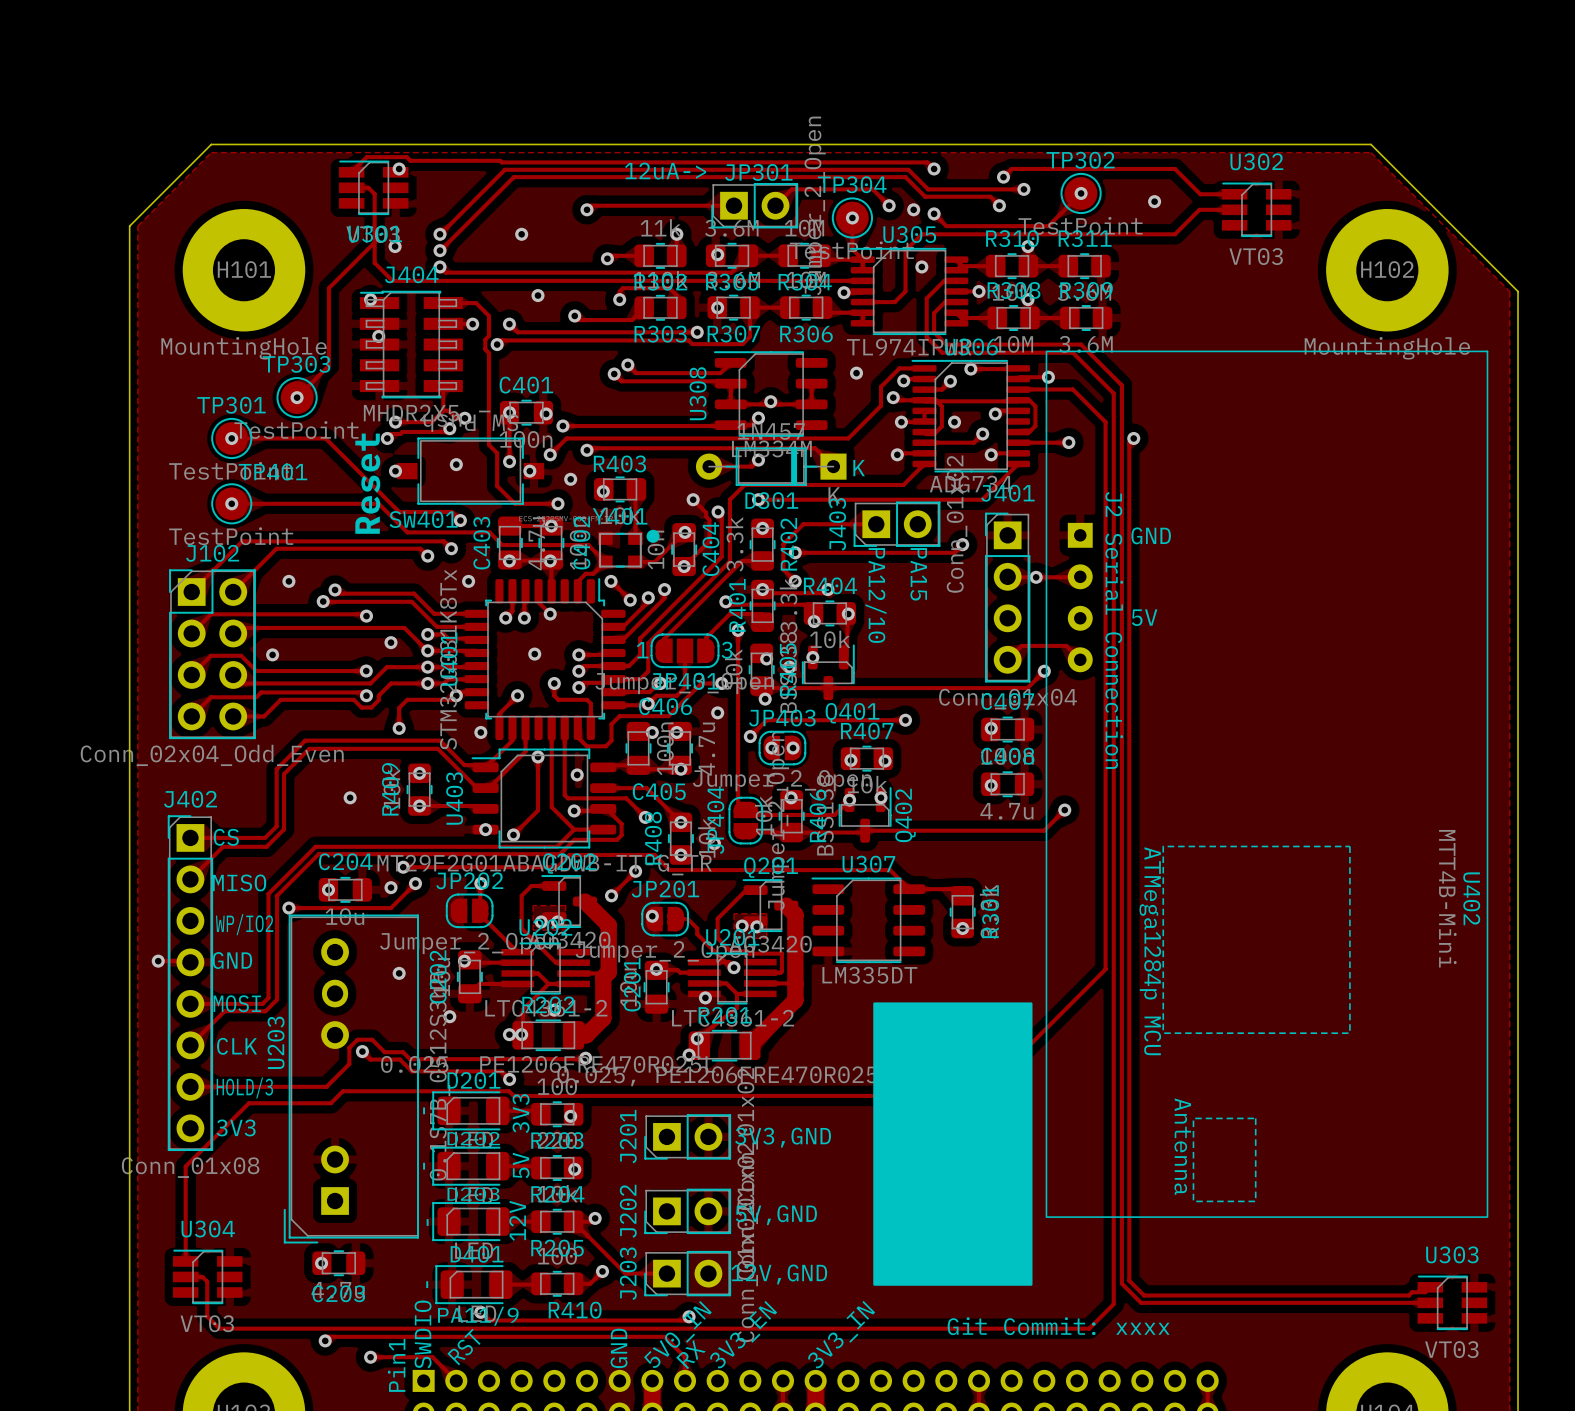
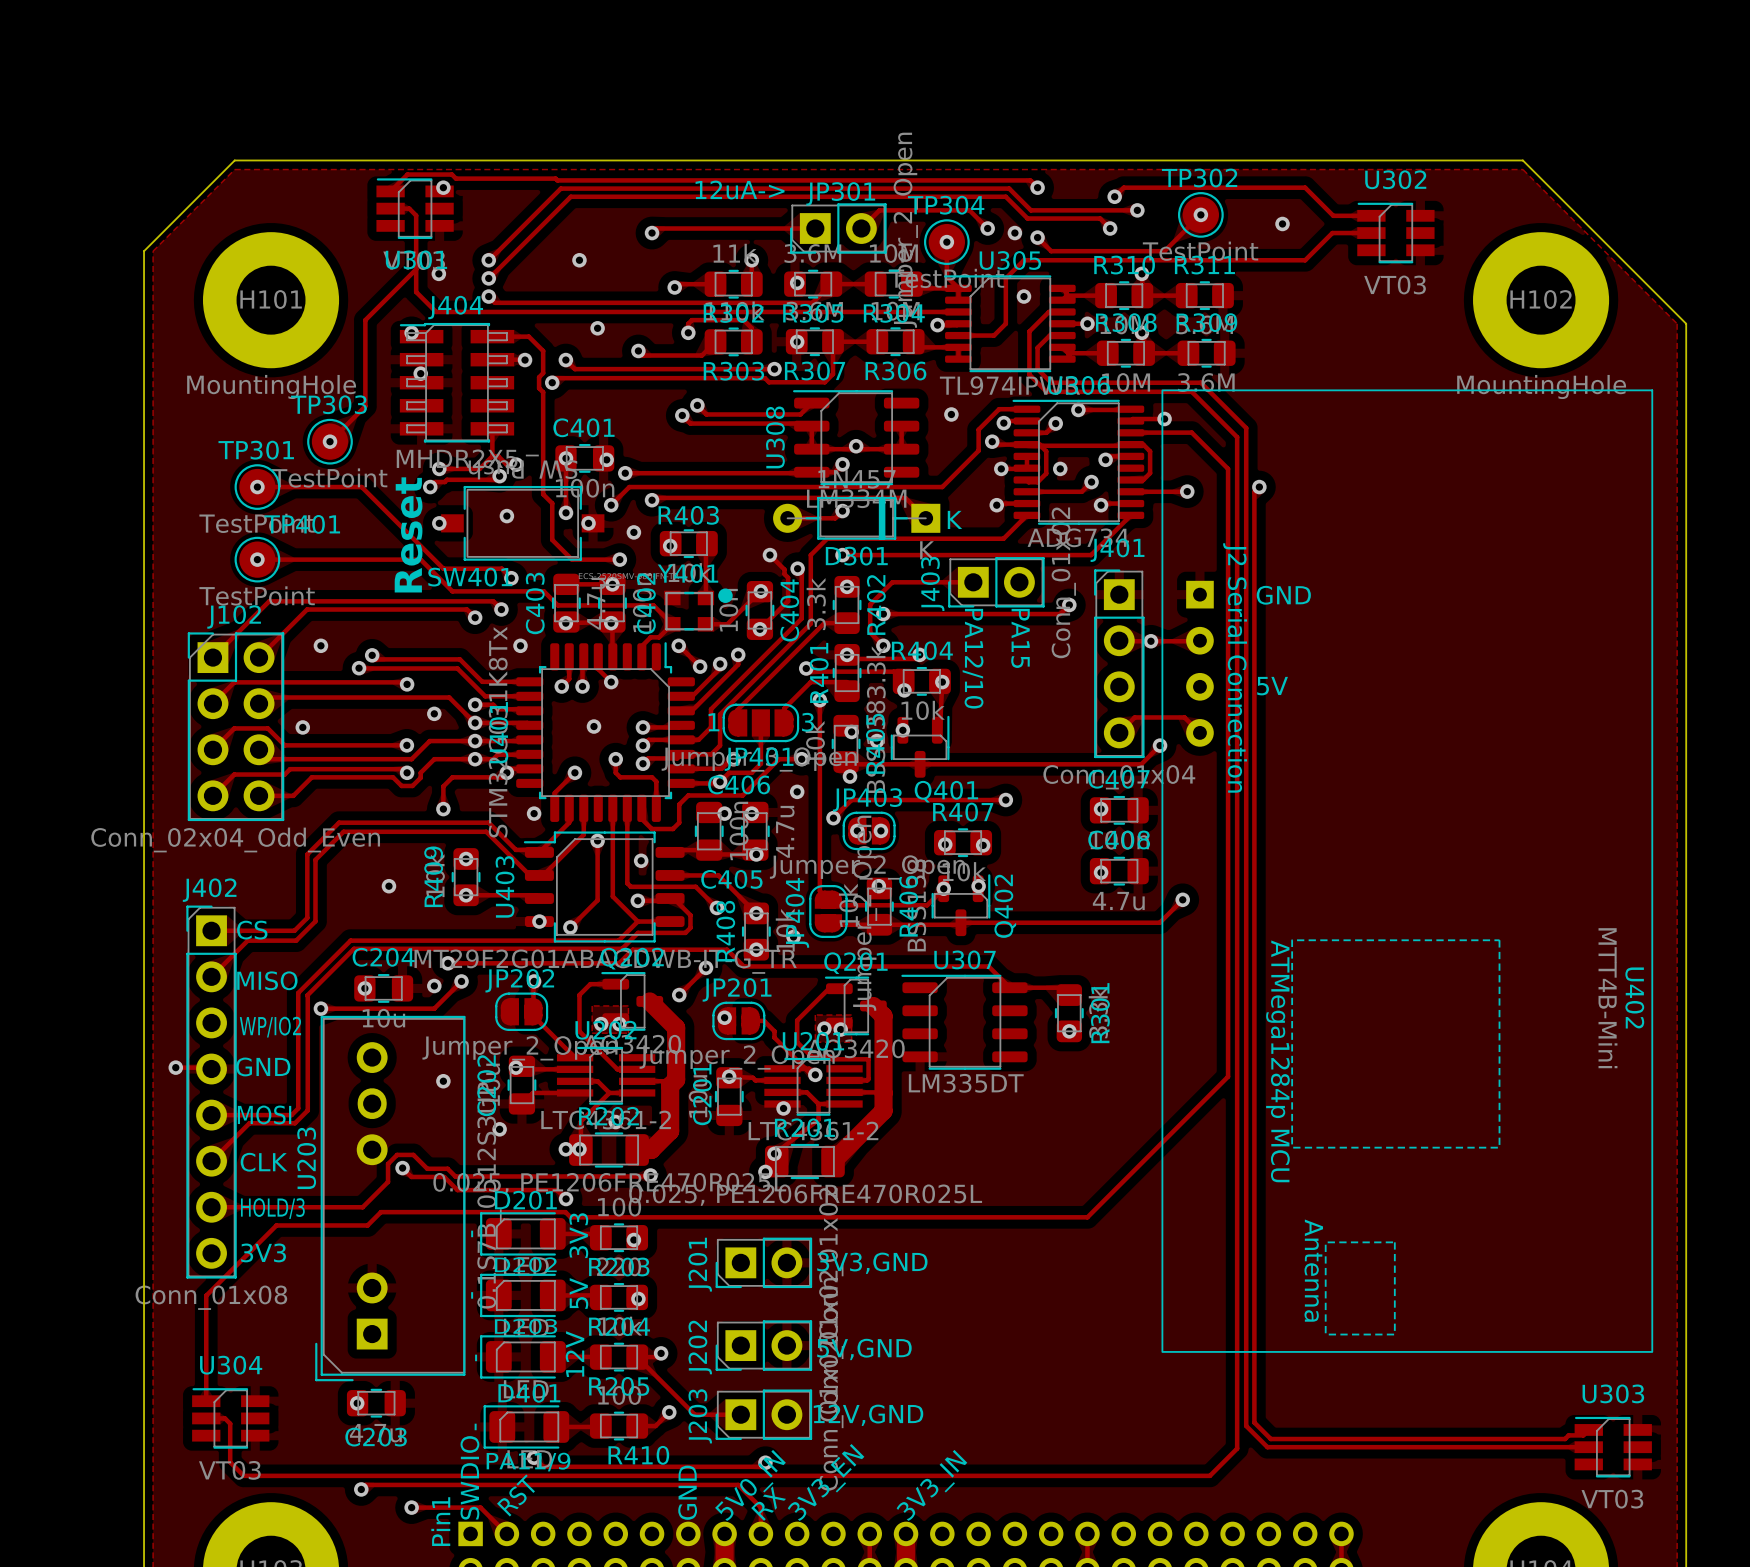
drawing: [873, 1002, 1033, 1286] -> none
text: Git Commit: xxxx (1058, 1326) -> none

